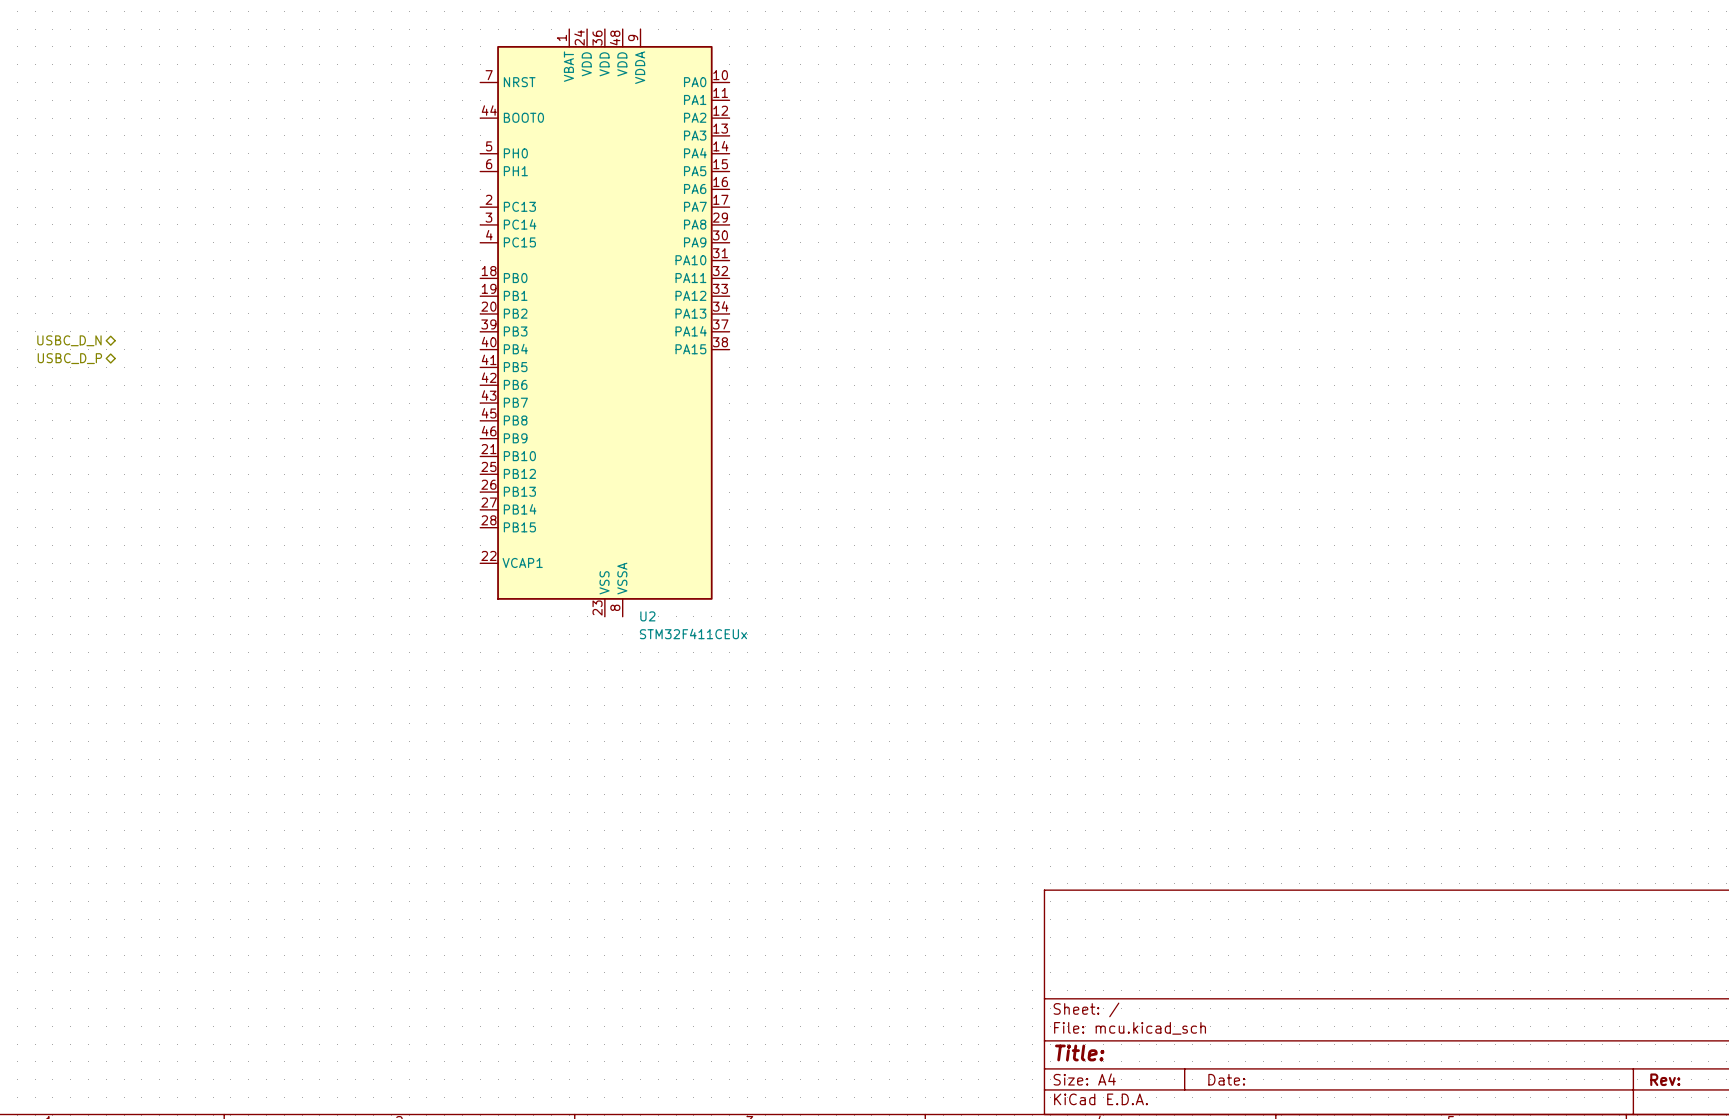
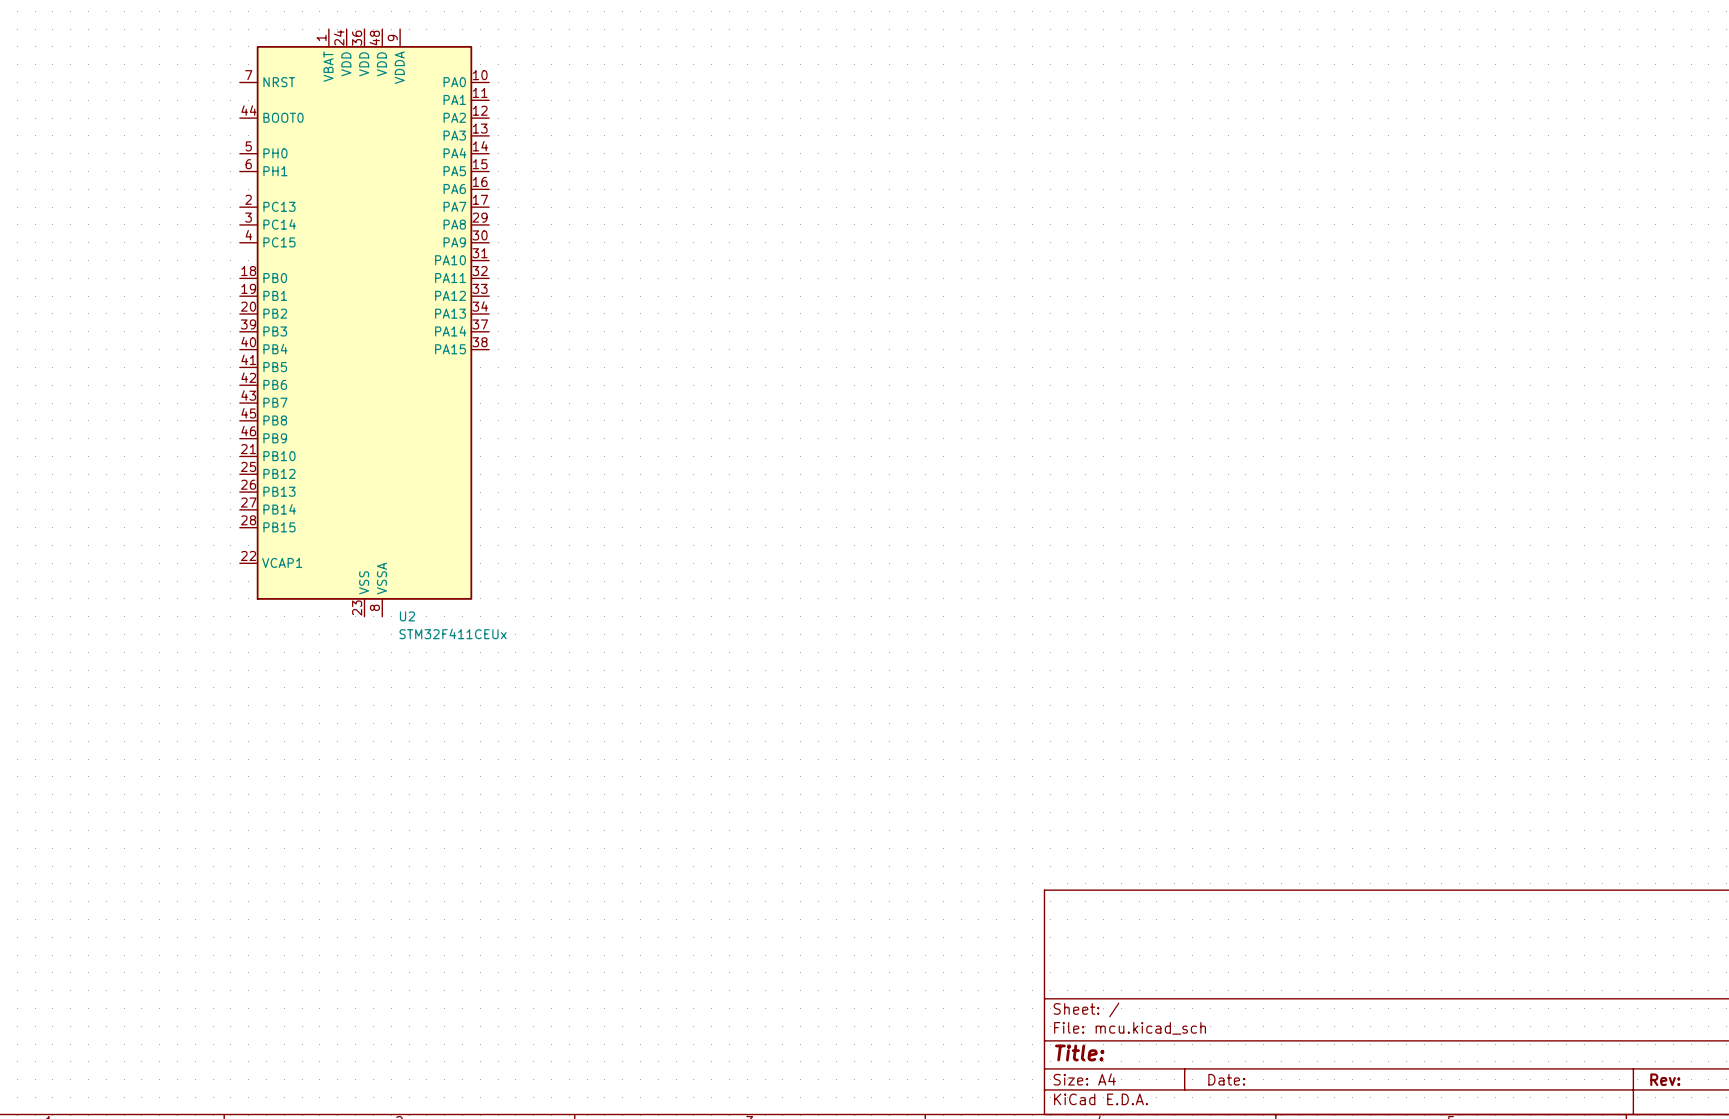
U2 position: (604, 322) -> (364, 322)
hierarchical label: USBC_D_N (69, 340) -> none
hierarchical label: USBC_D_P (69, 358) -> none

